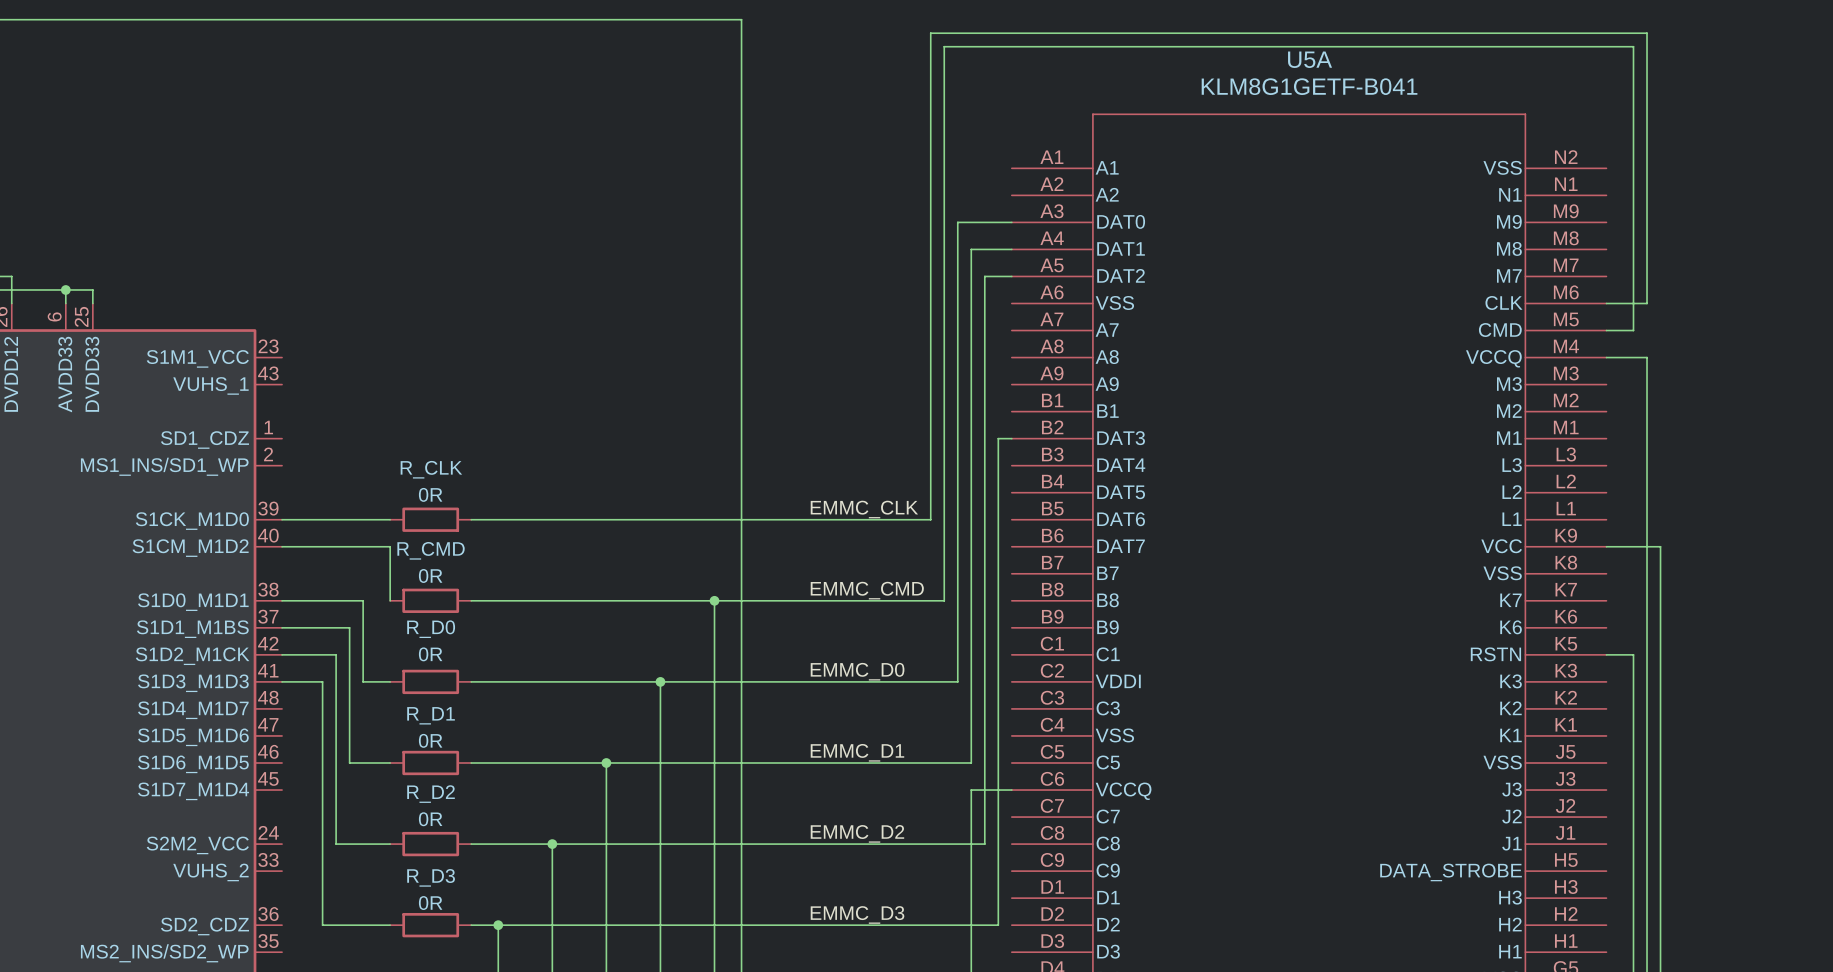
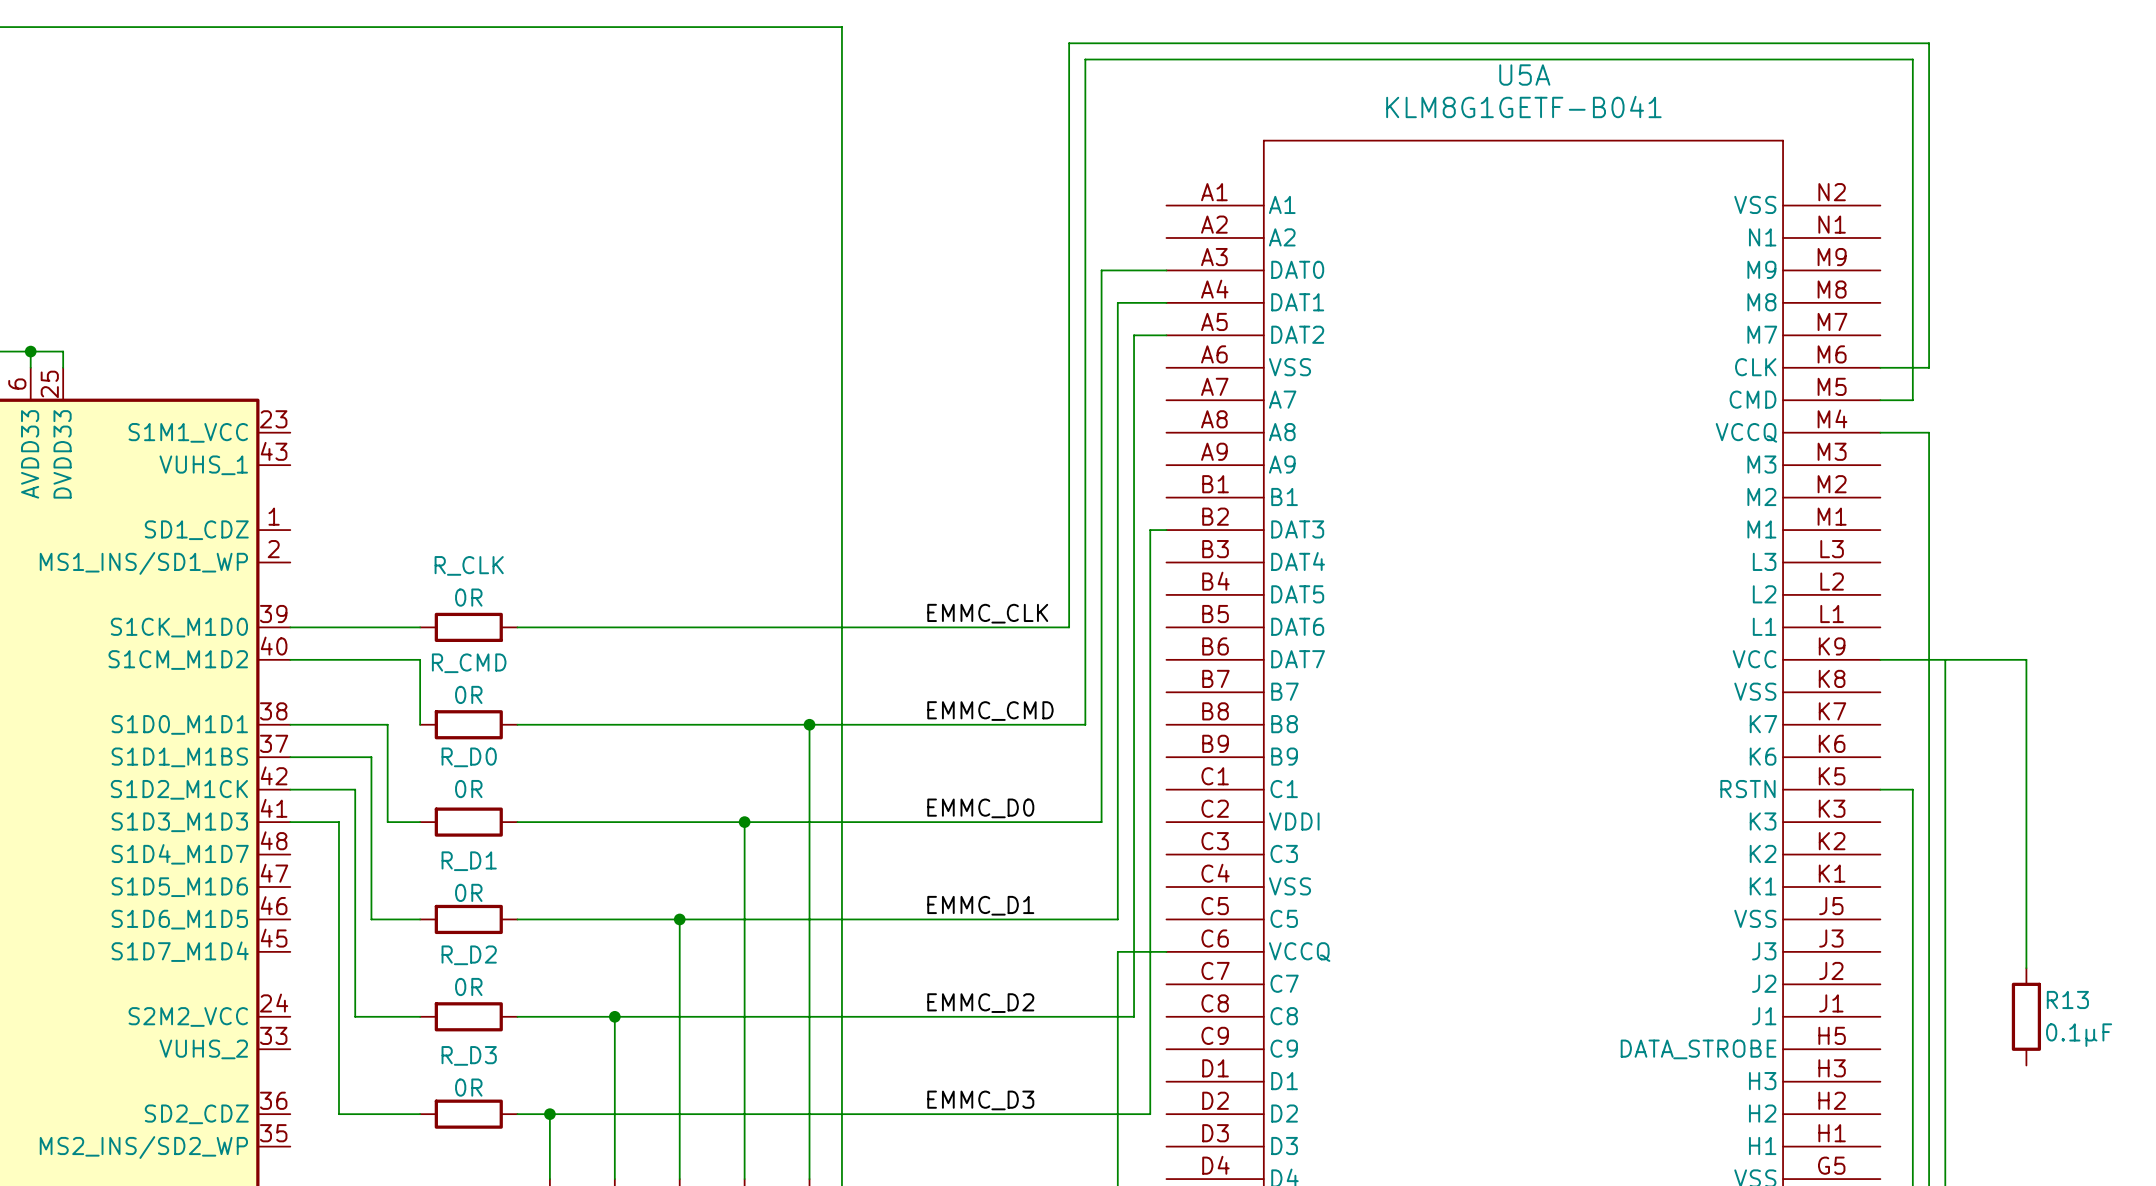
wire: none -> (1945, 659) (2026, 659) (2026, 968)
R13: none -> 0.1µF (2026, 1016)

